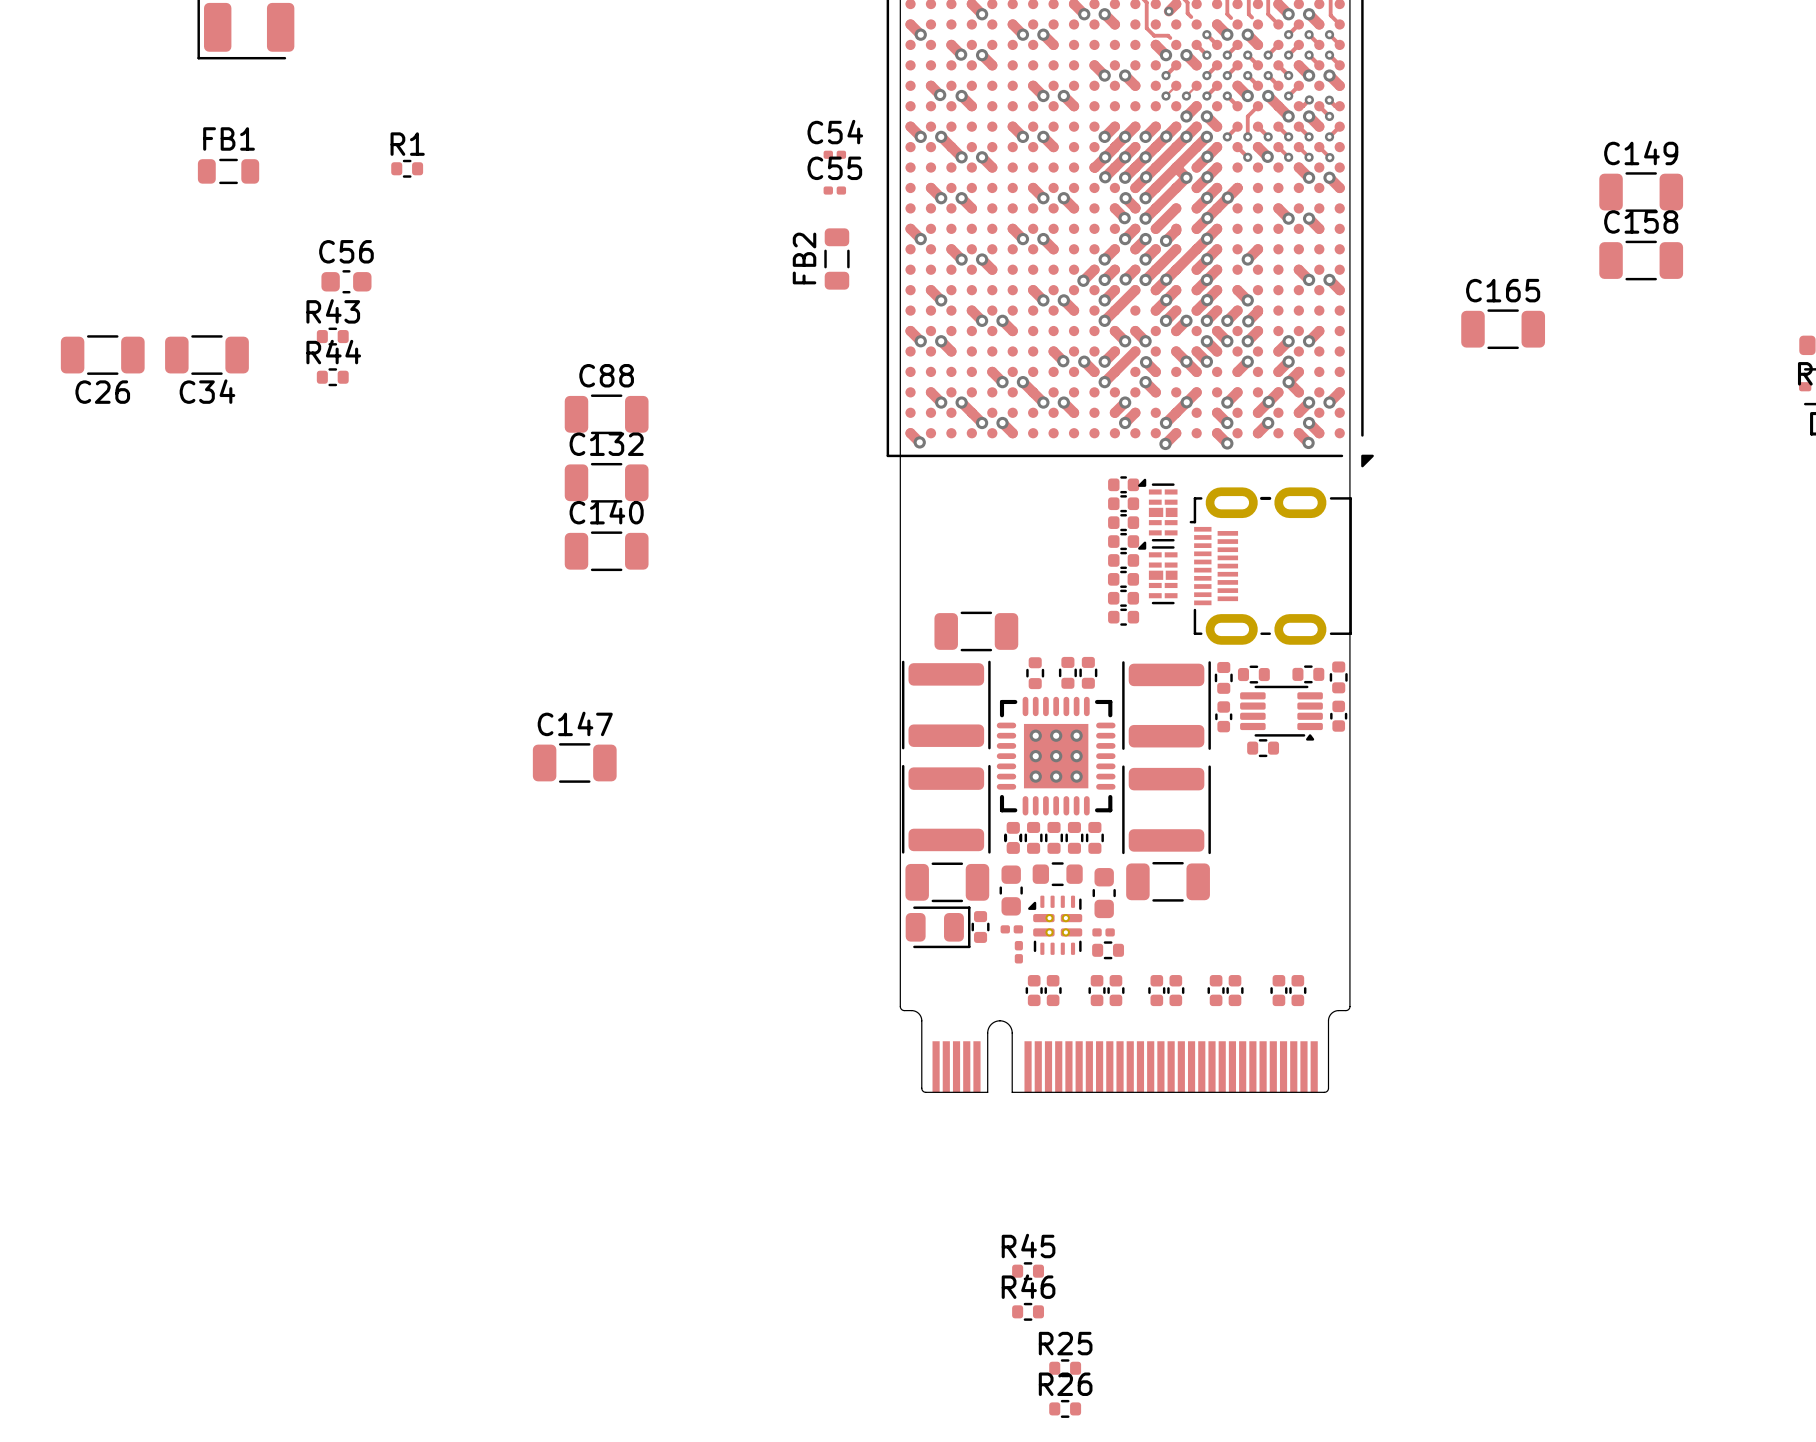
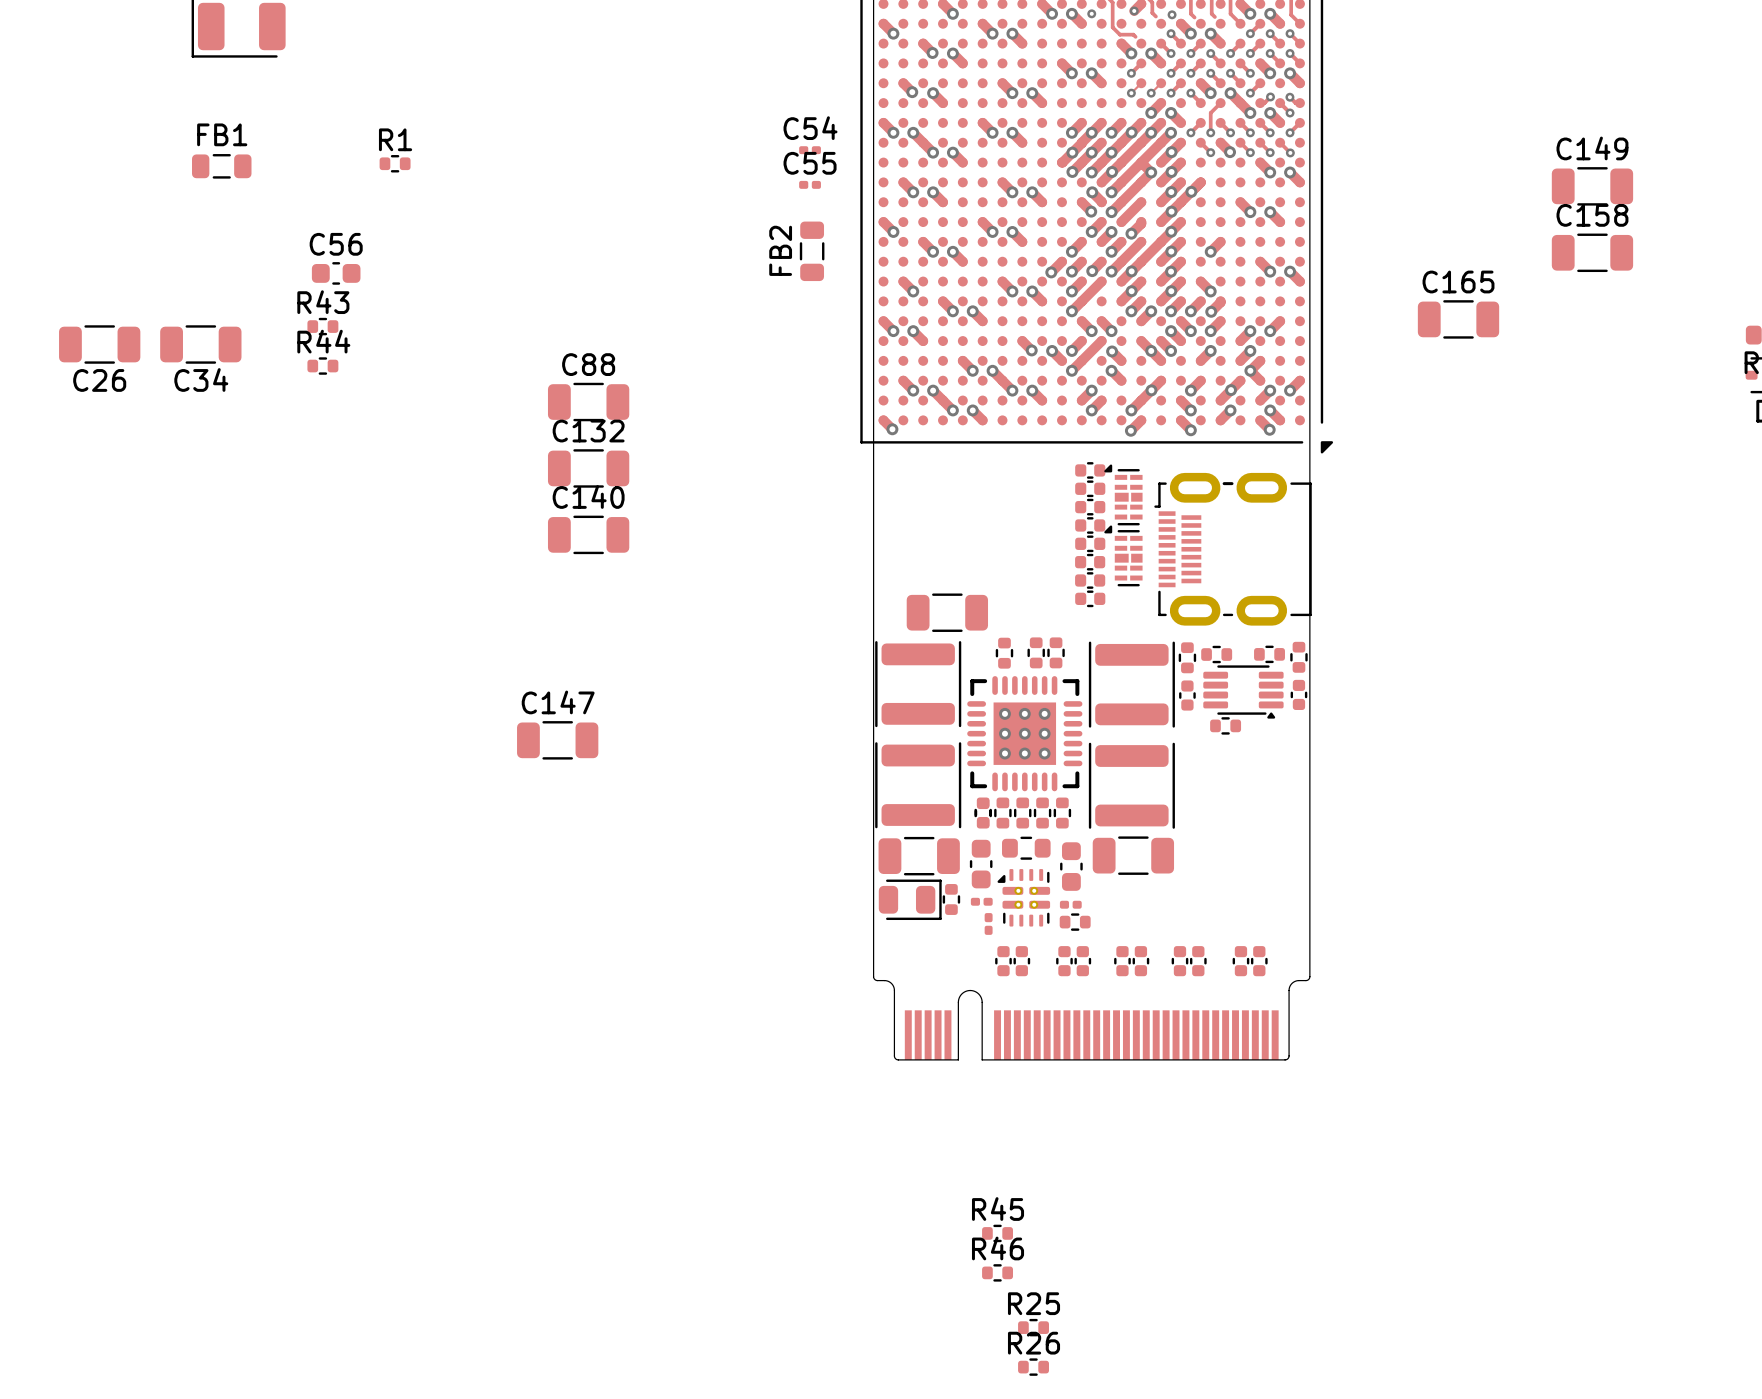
via: none -> (1091, 13)
via: none -> (1172, 14)

